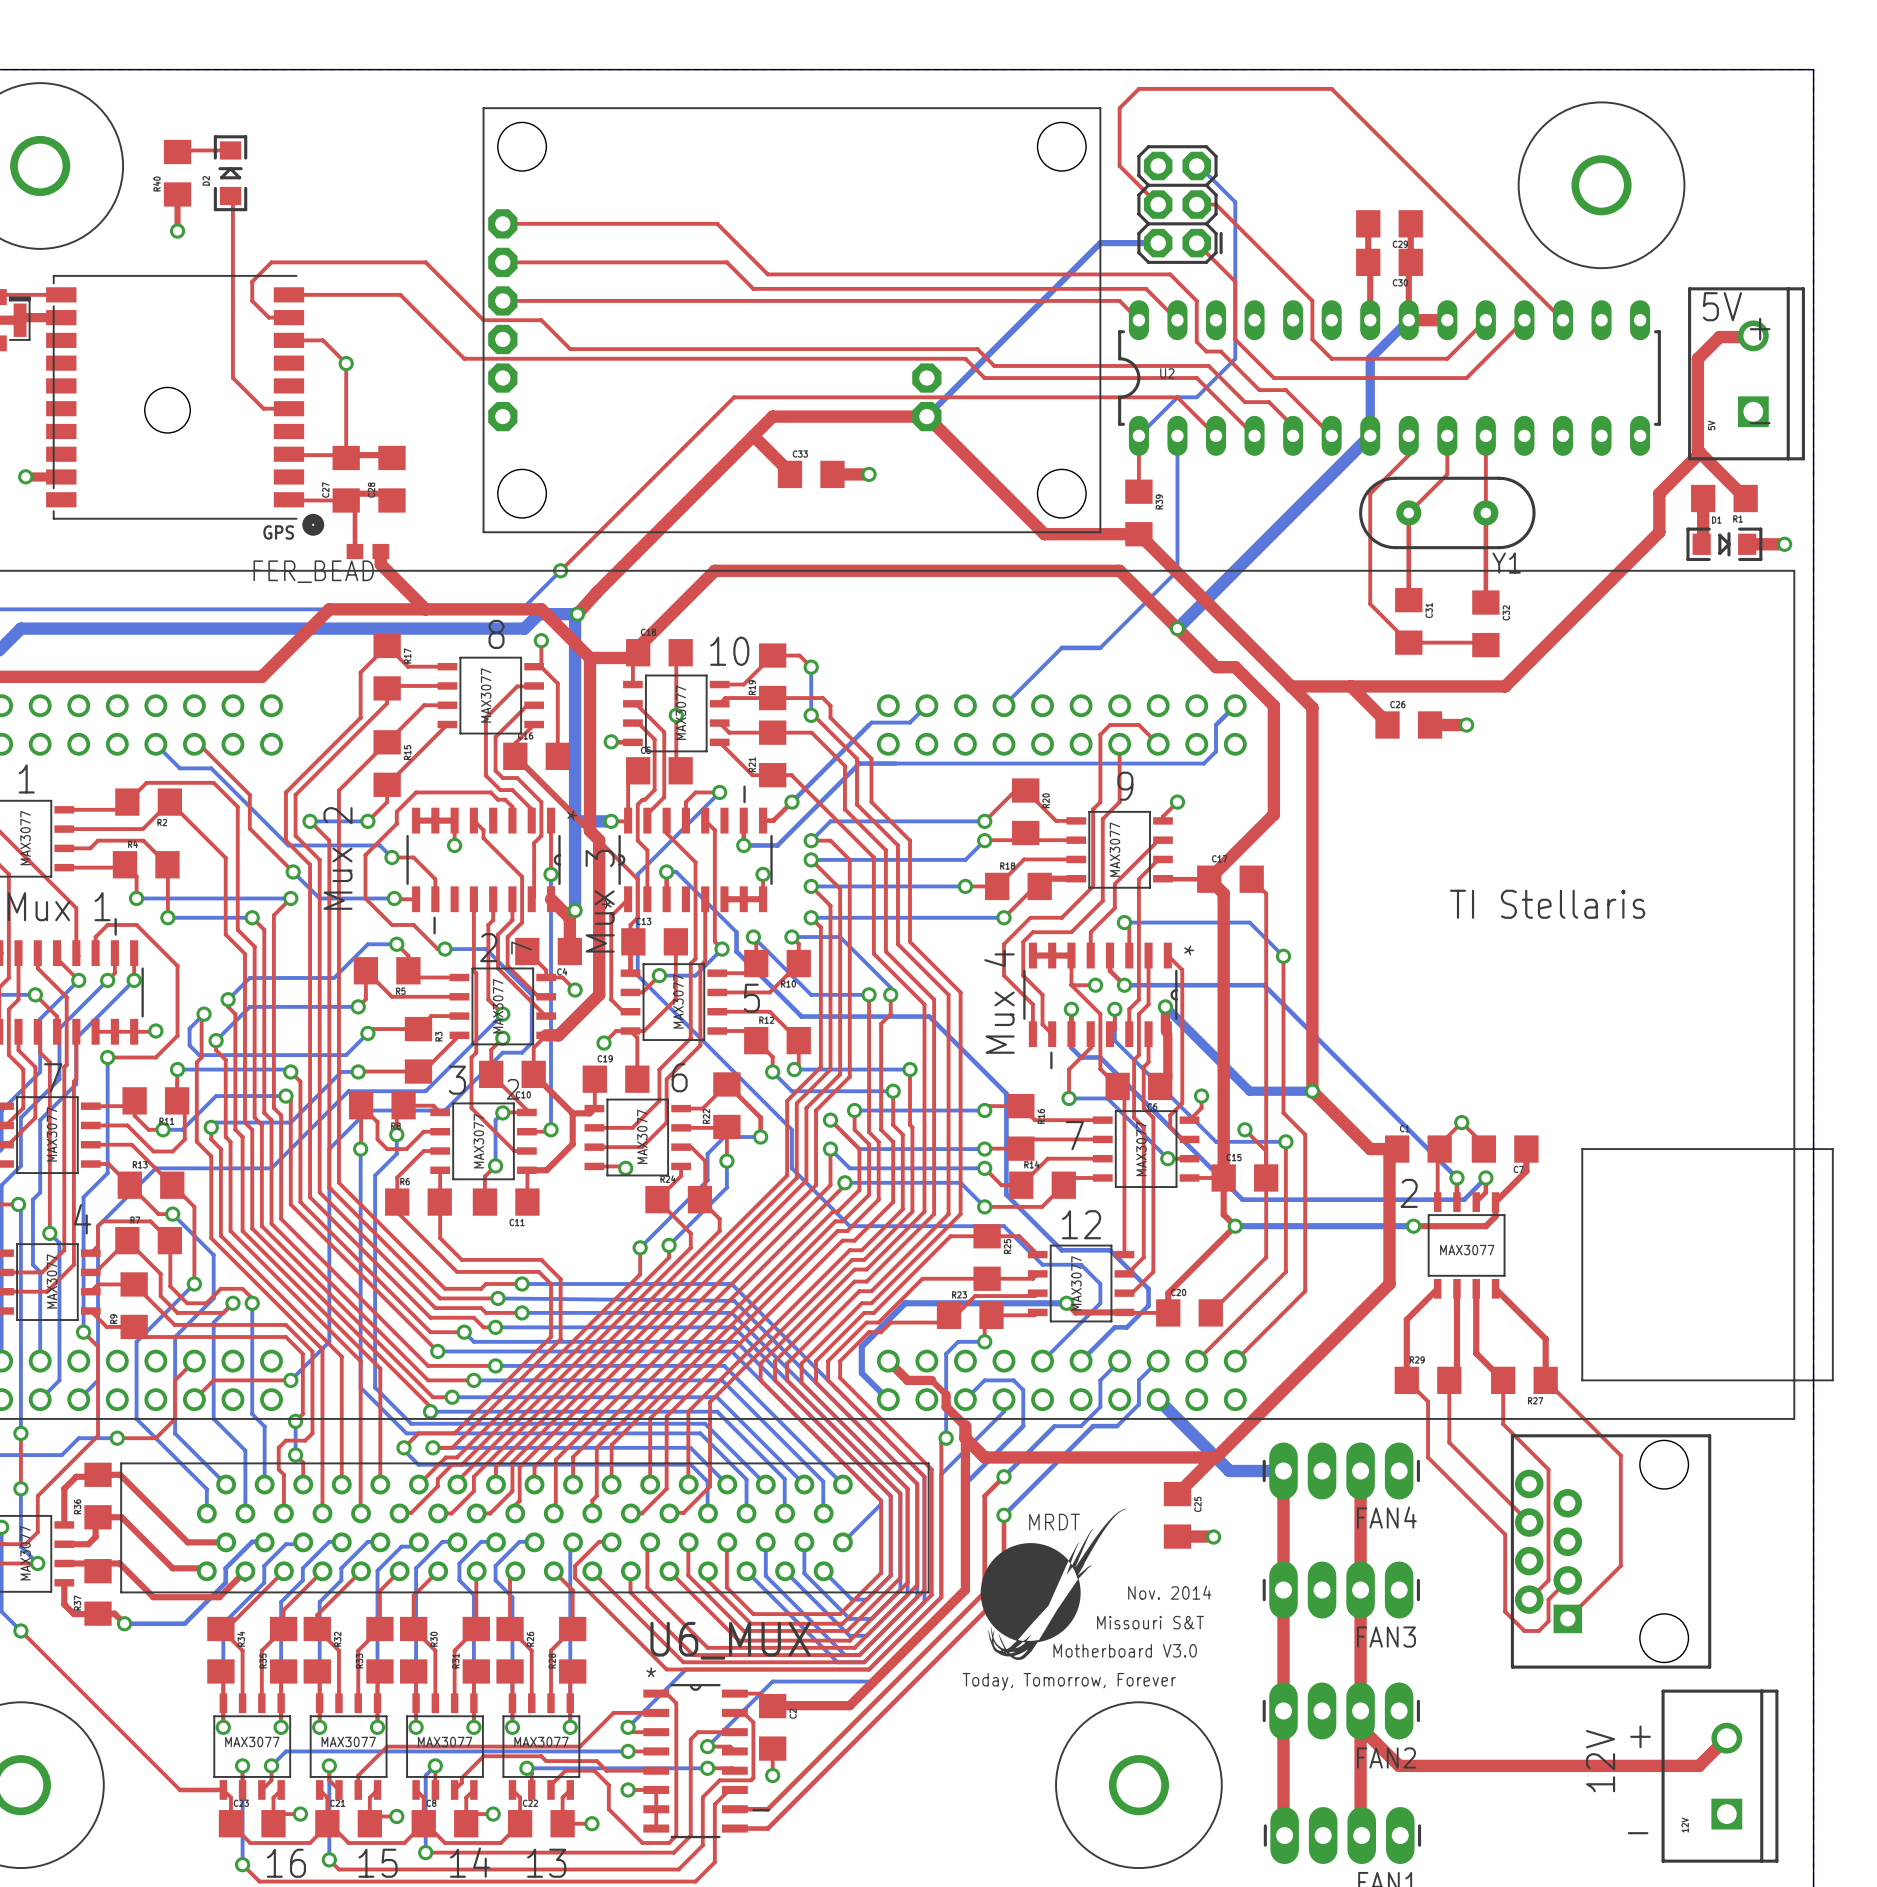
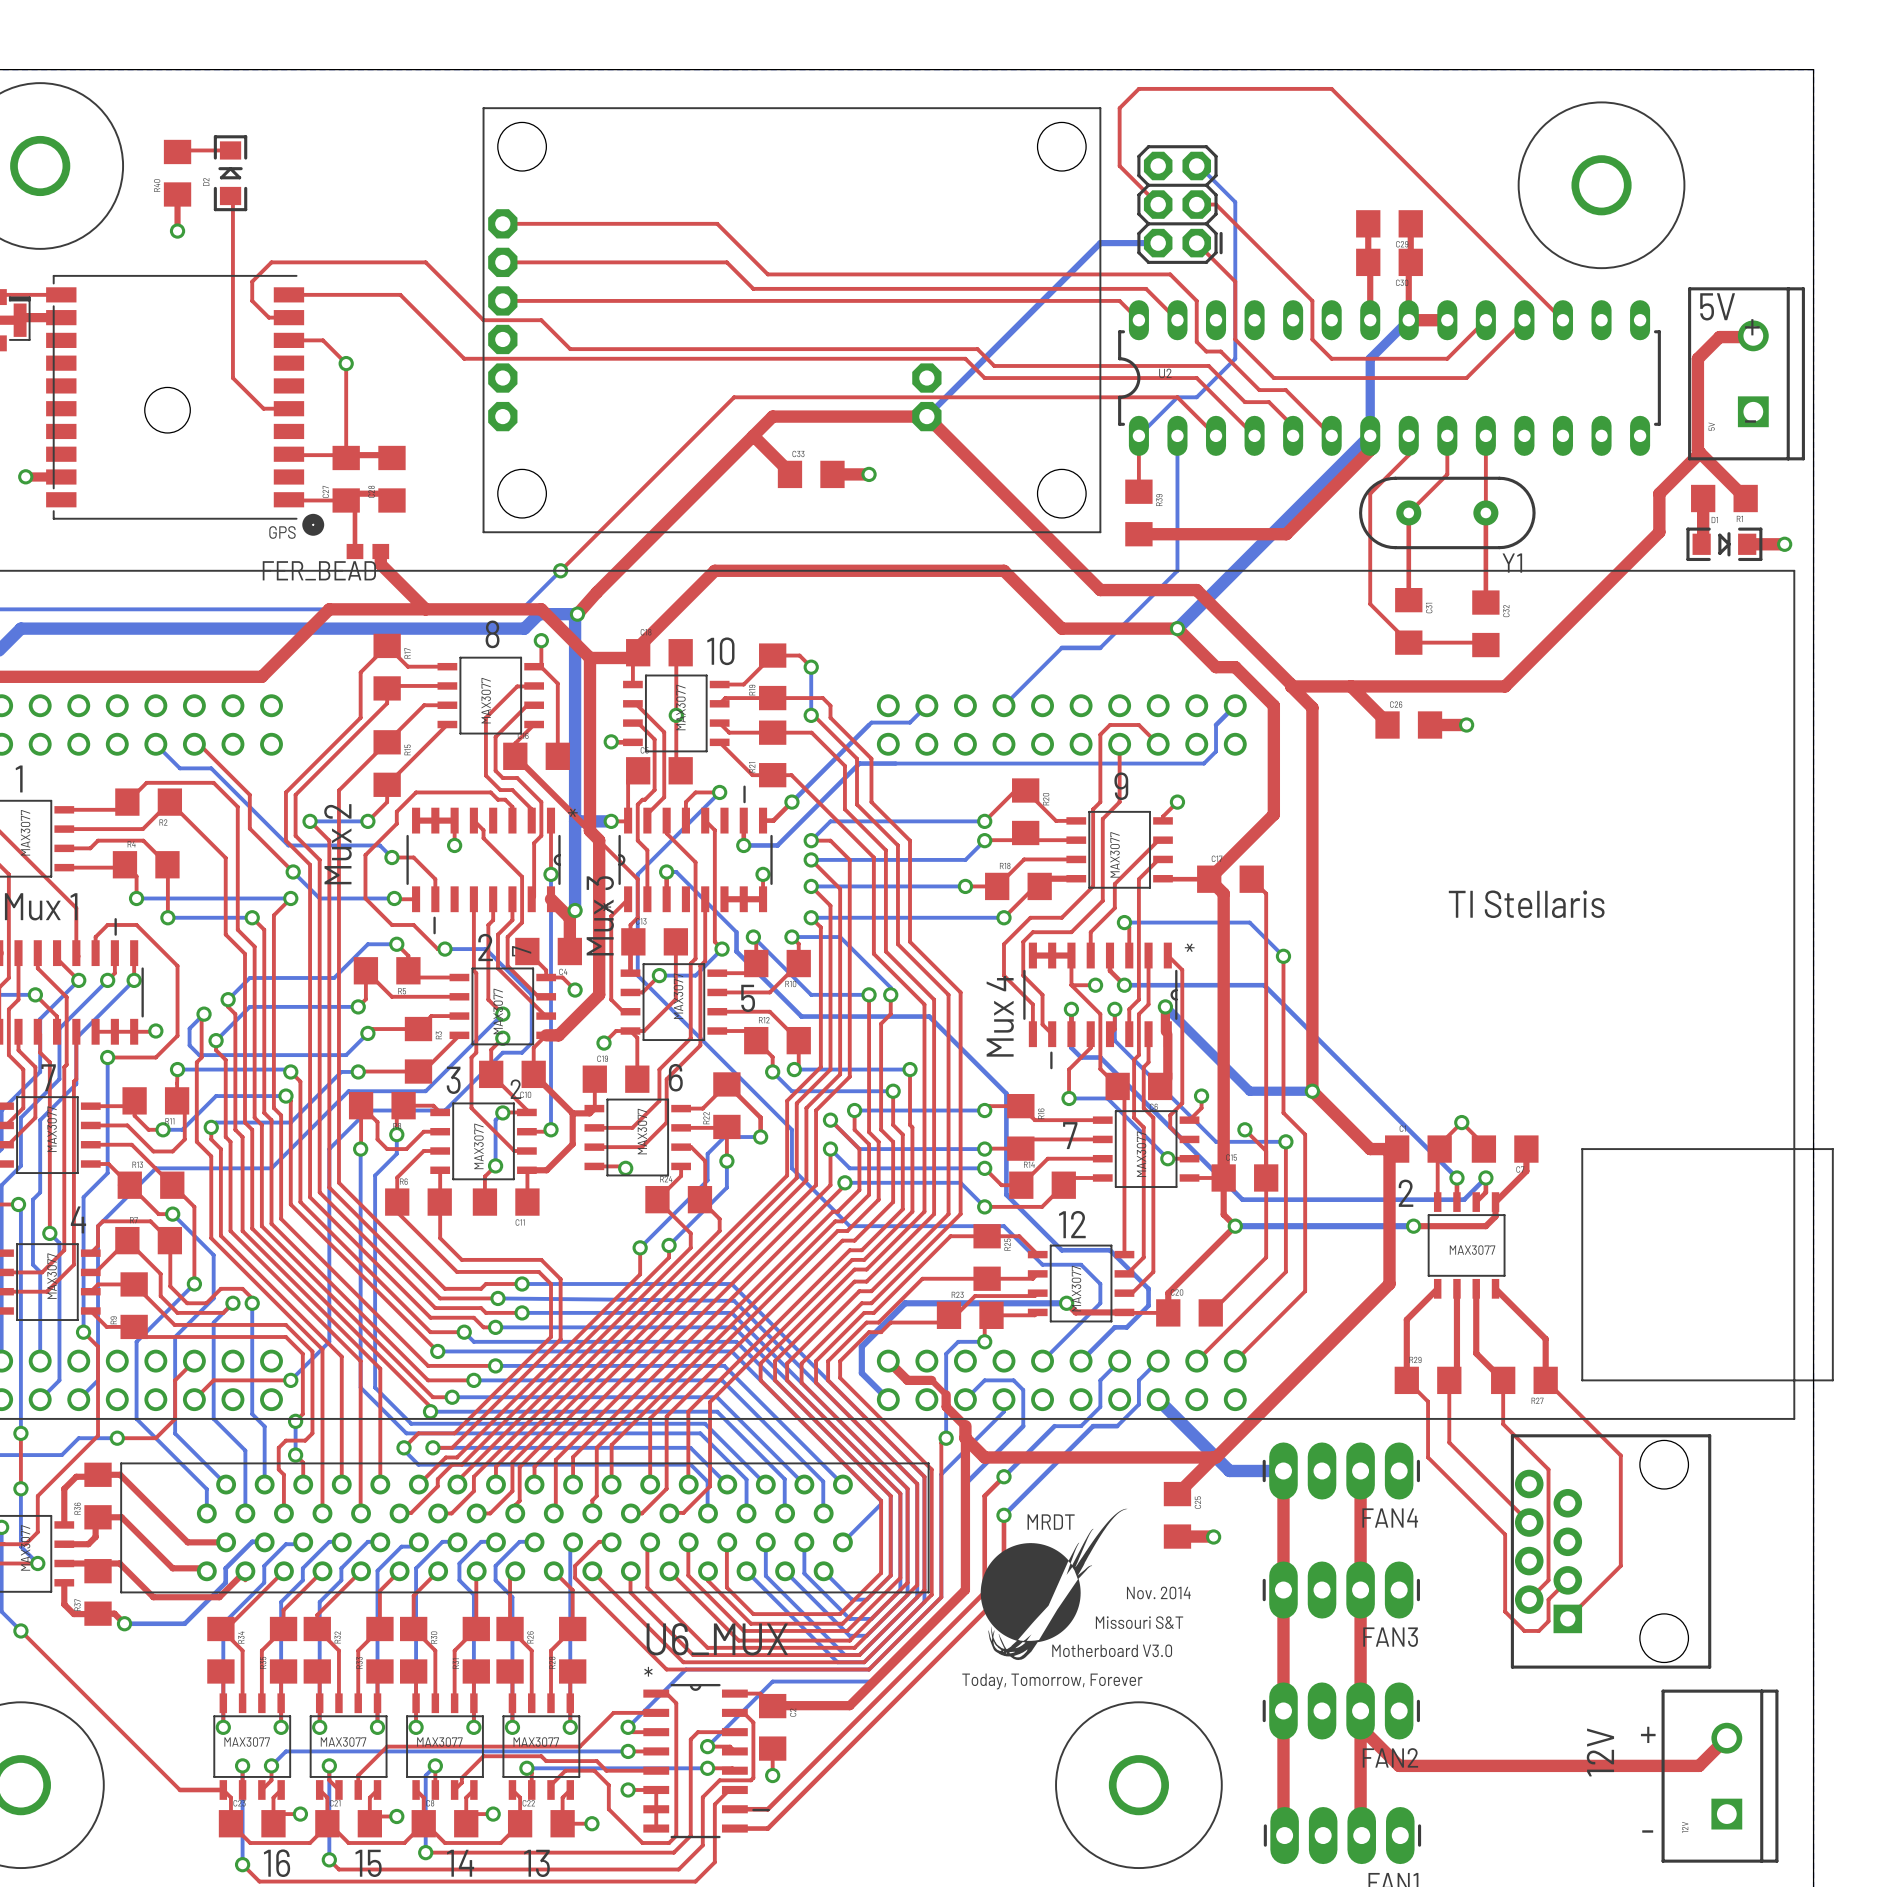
top track: none -> (1370, 435) (1370, 450) (1286, 534) (1138, 534)
top track: (1044, 534) (1138, 534) (1291, 686) -> (1044, 534) (1100, 590) (1196, 590) (1291, 686)
top track: (1003, 570) (1119, 570) (1177, 628) -> (1003, 570) (1061, 628) (1177, 628)

